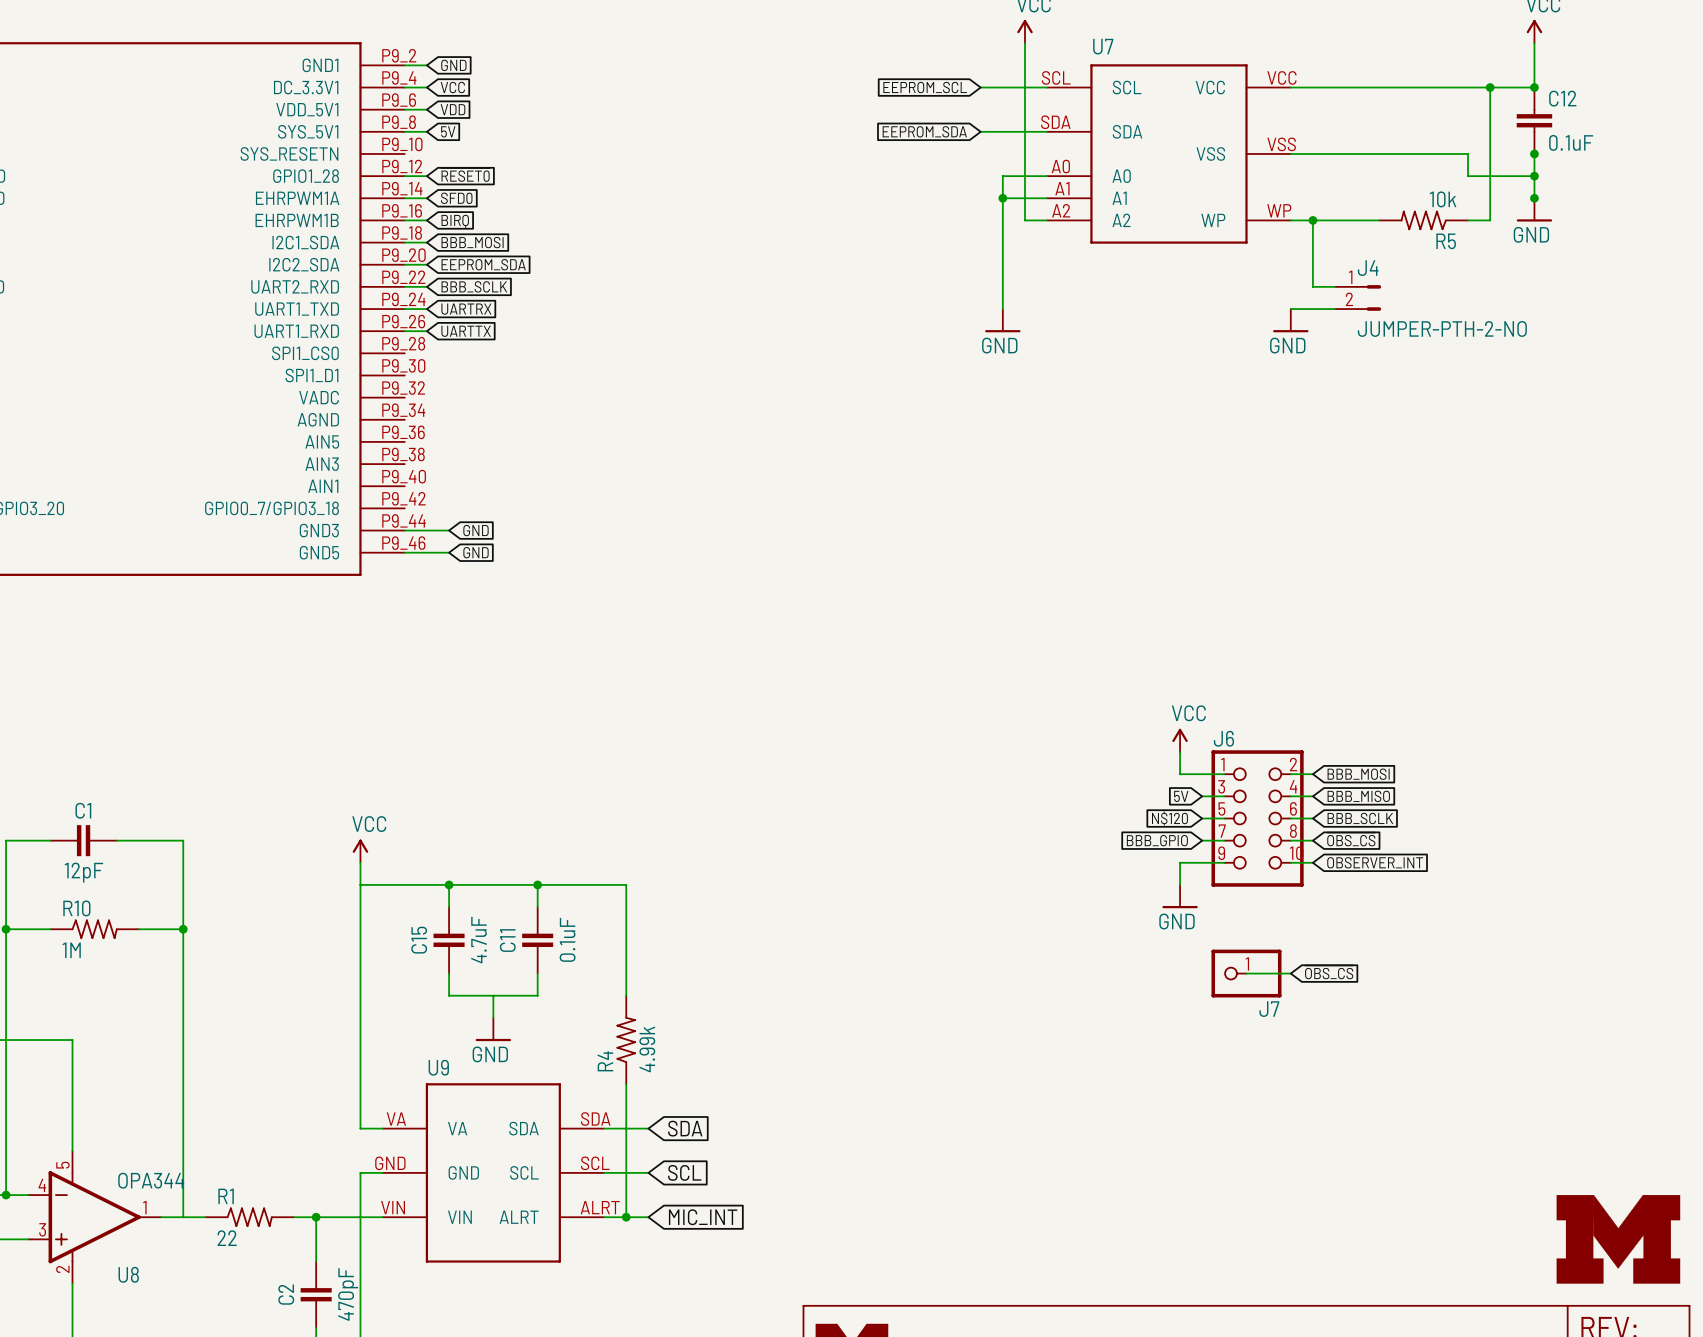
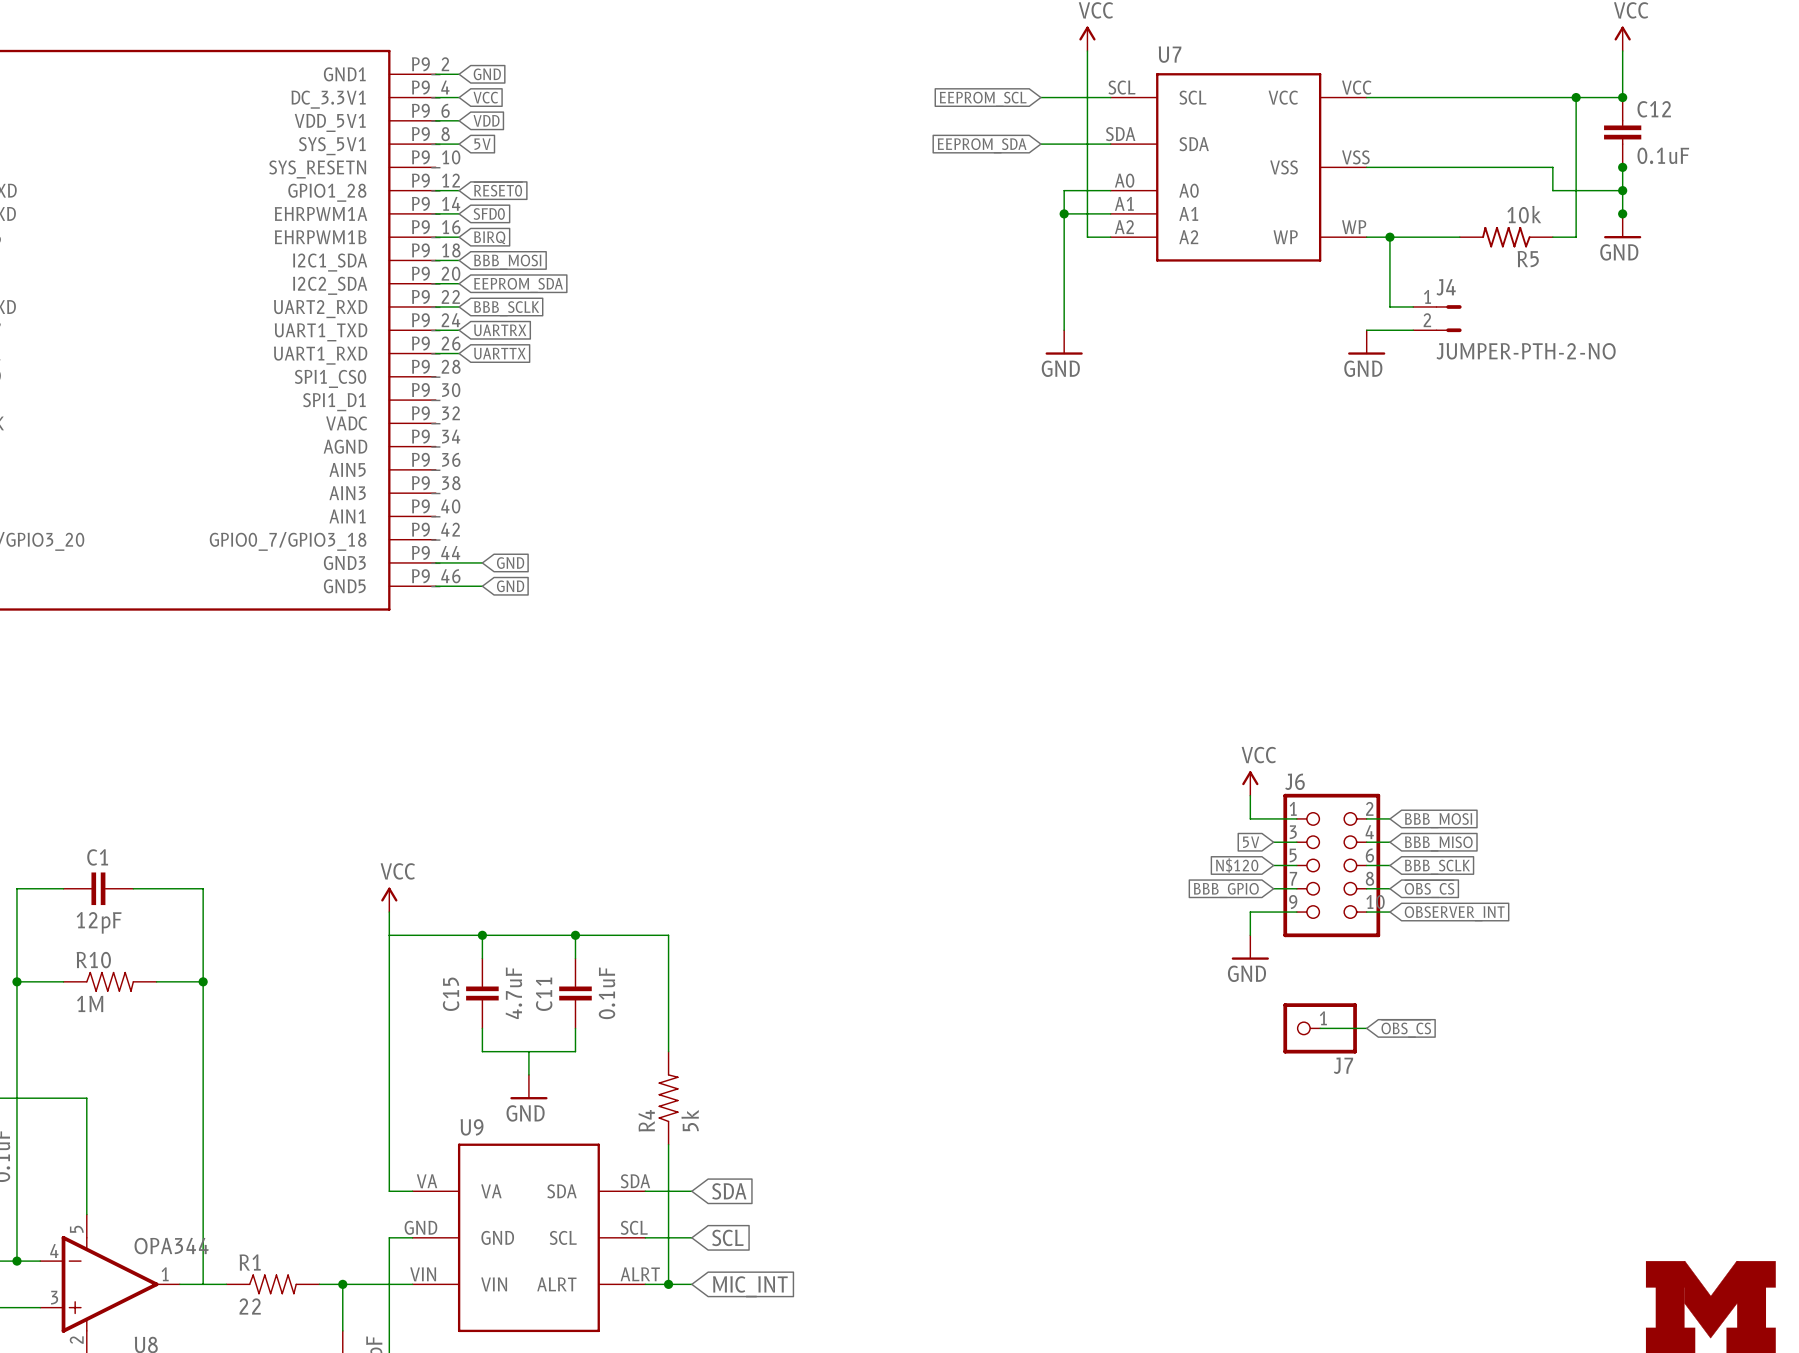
R4 value: 4.99k (647, 1049) -> 5k (690, 1120)

